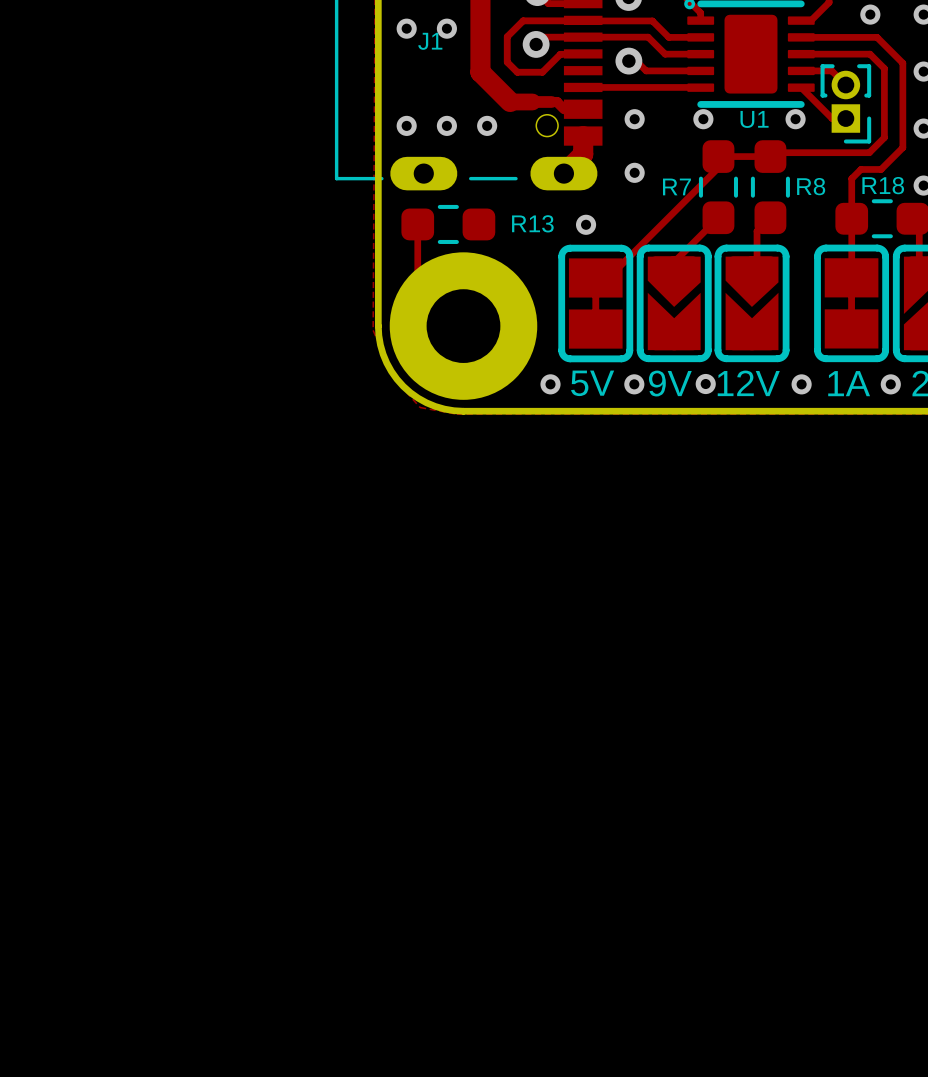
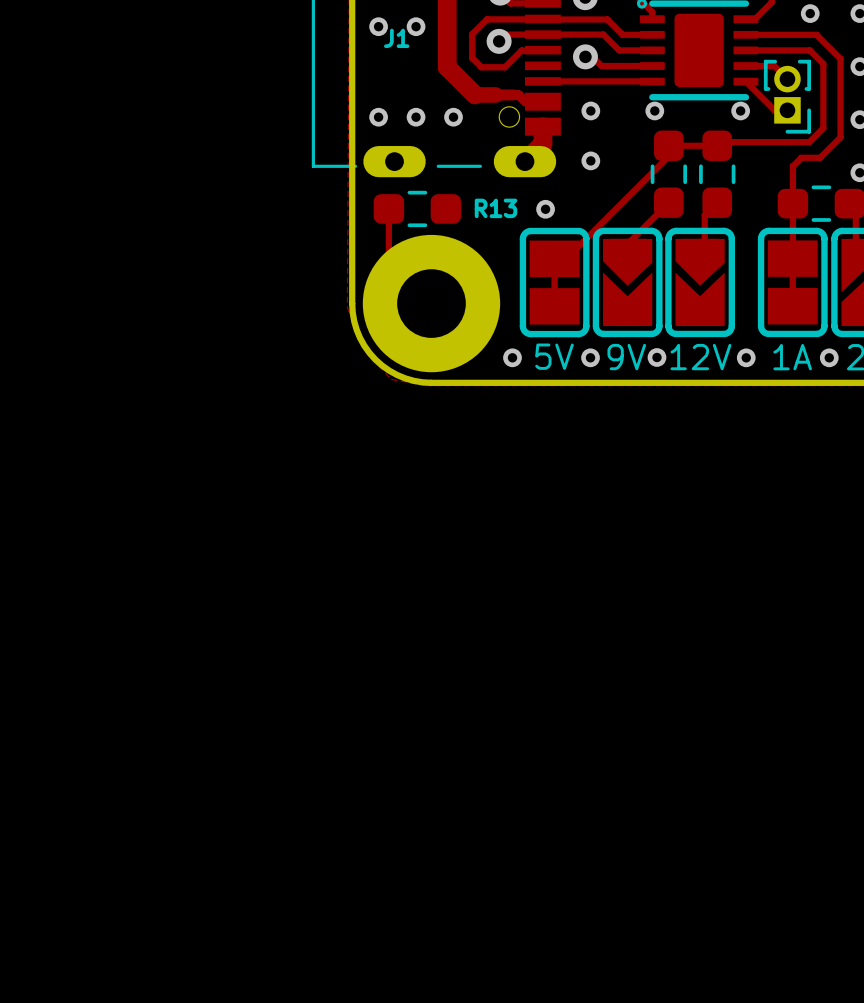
U1 name: U1 (754, 119) -> none
R18 name: R18 (883, 185) -> none
R7 name: R7 (676, 186) -> none
R8 name: R8 (811, 186) -> none

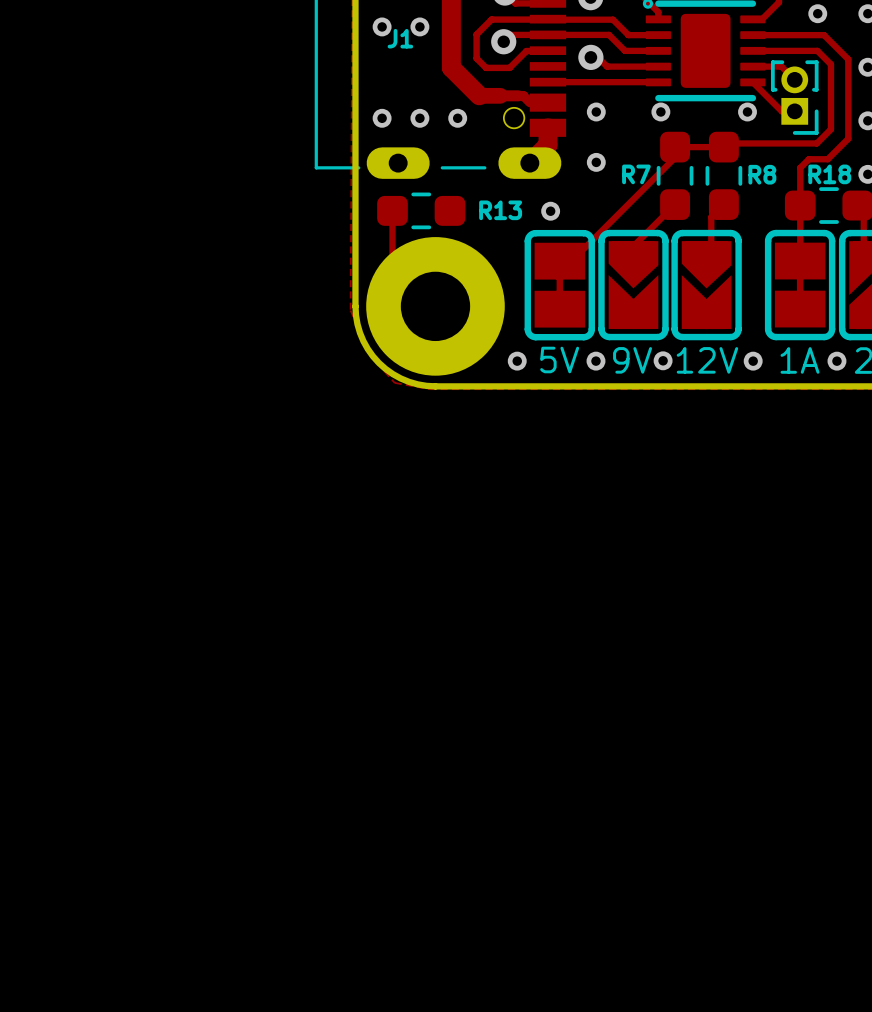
R7 name: none -> R7 (636, 174)
R18 name: none -> R18 (829, 174)
R8 name: none -> R8 (762, 174)

